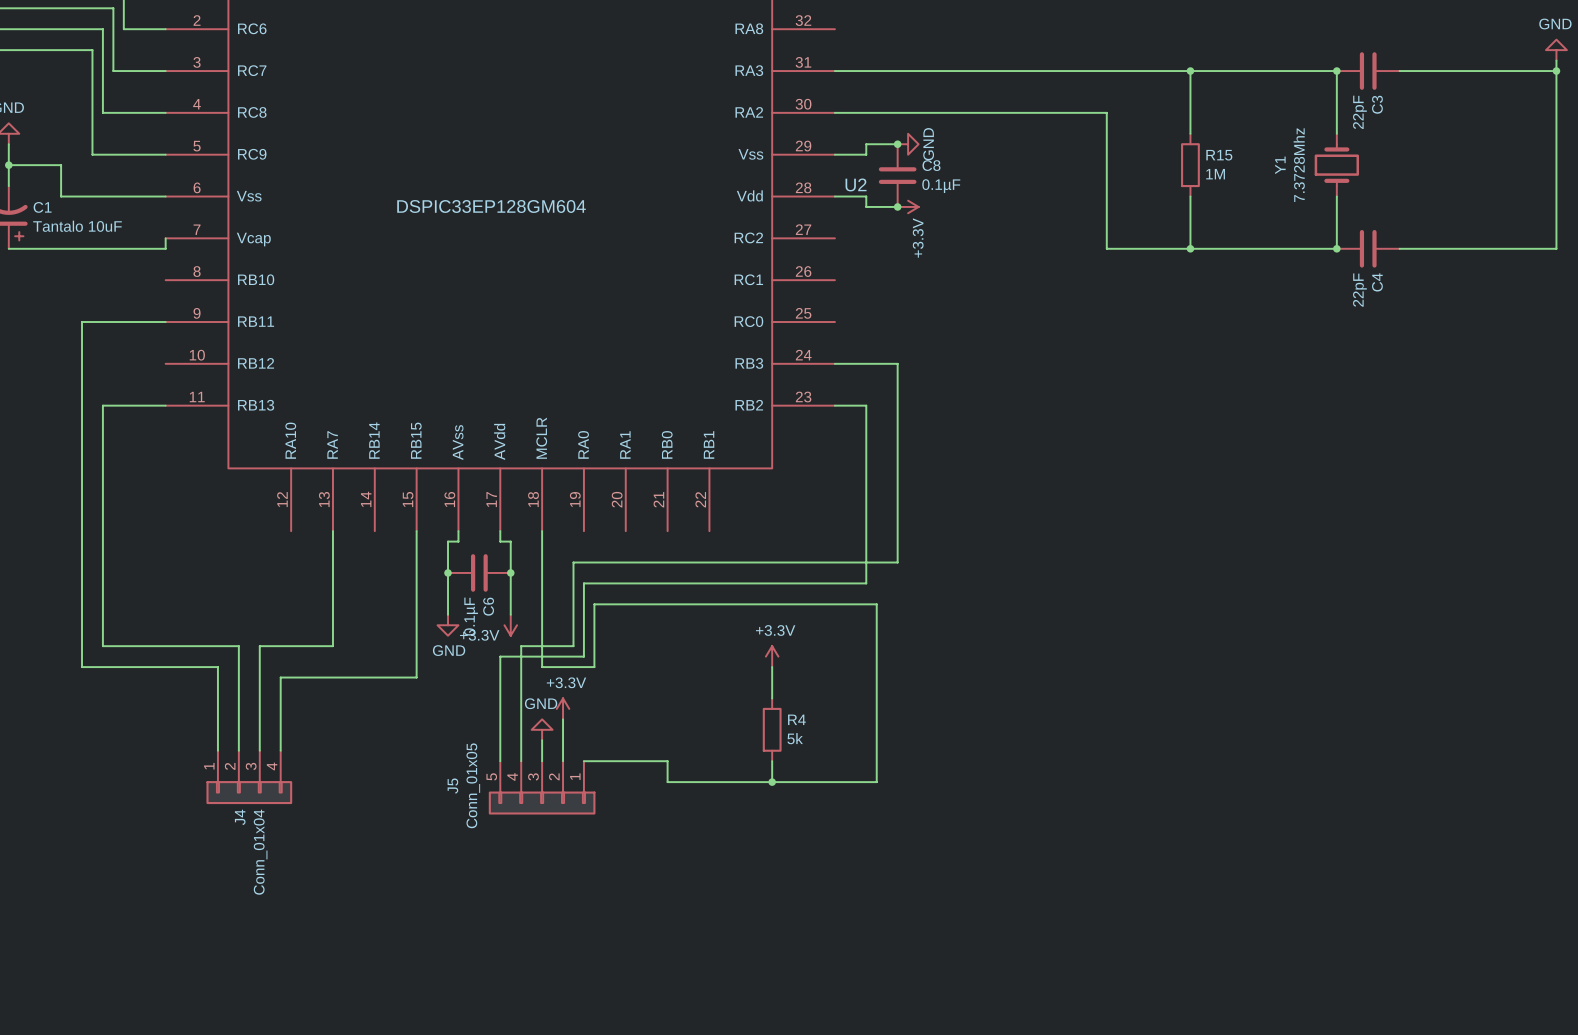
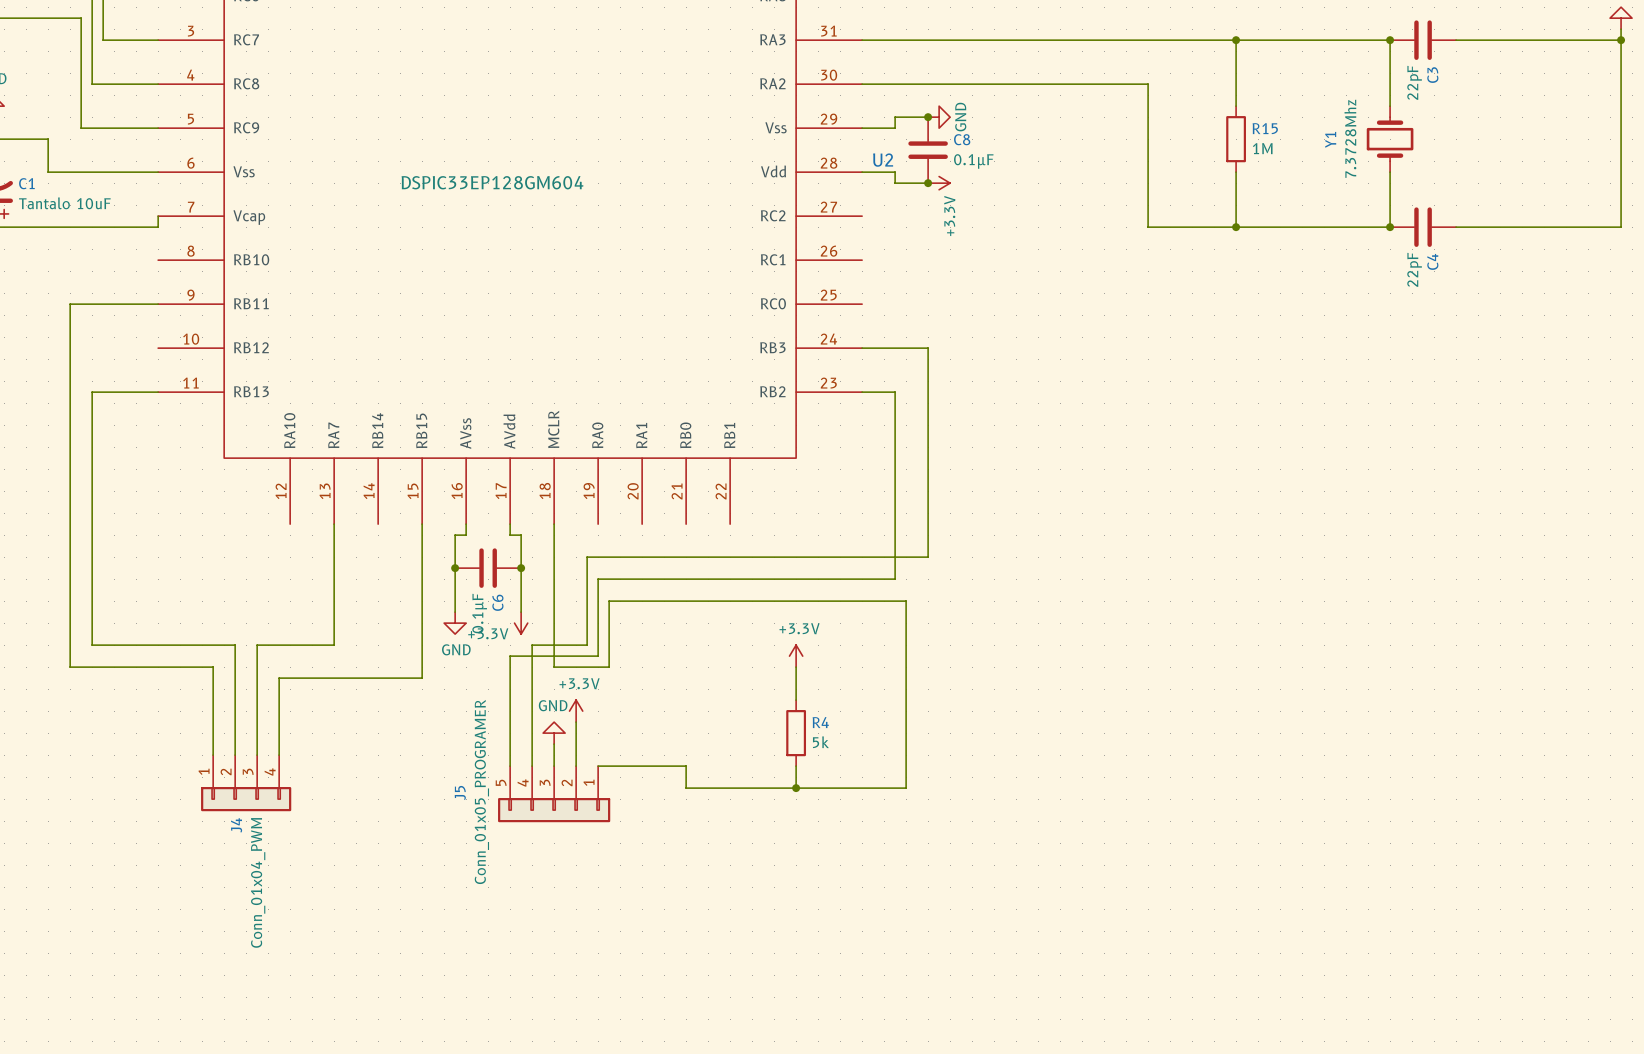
J5 value: Conn_01x05 (473, 785) -> Conn_01x05_PROGRAMER (481, 791)
J4 value: Conn_01x04 (260, 852) -> Conn_01x04_PWM (258, 882)

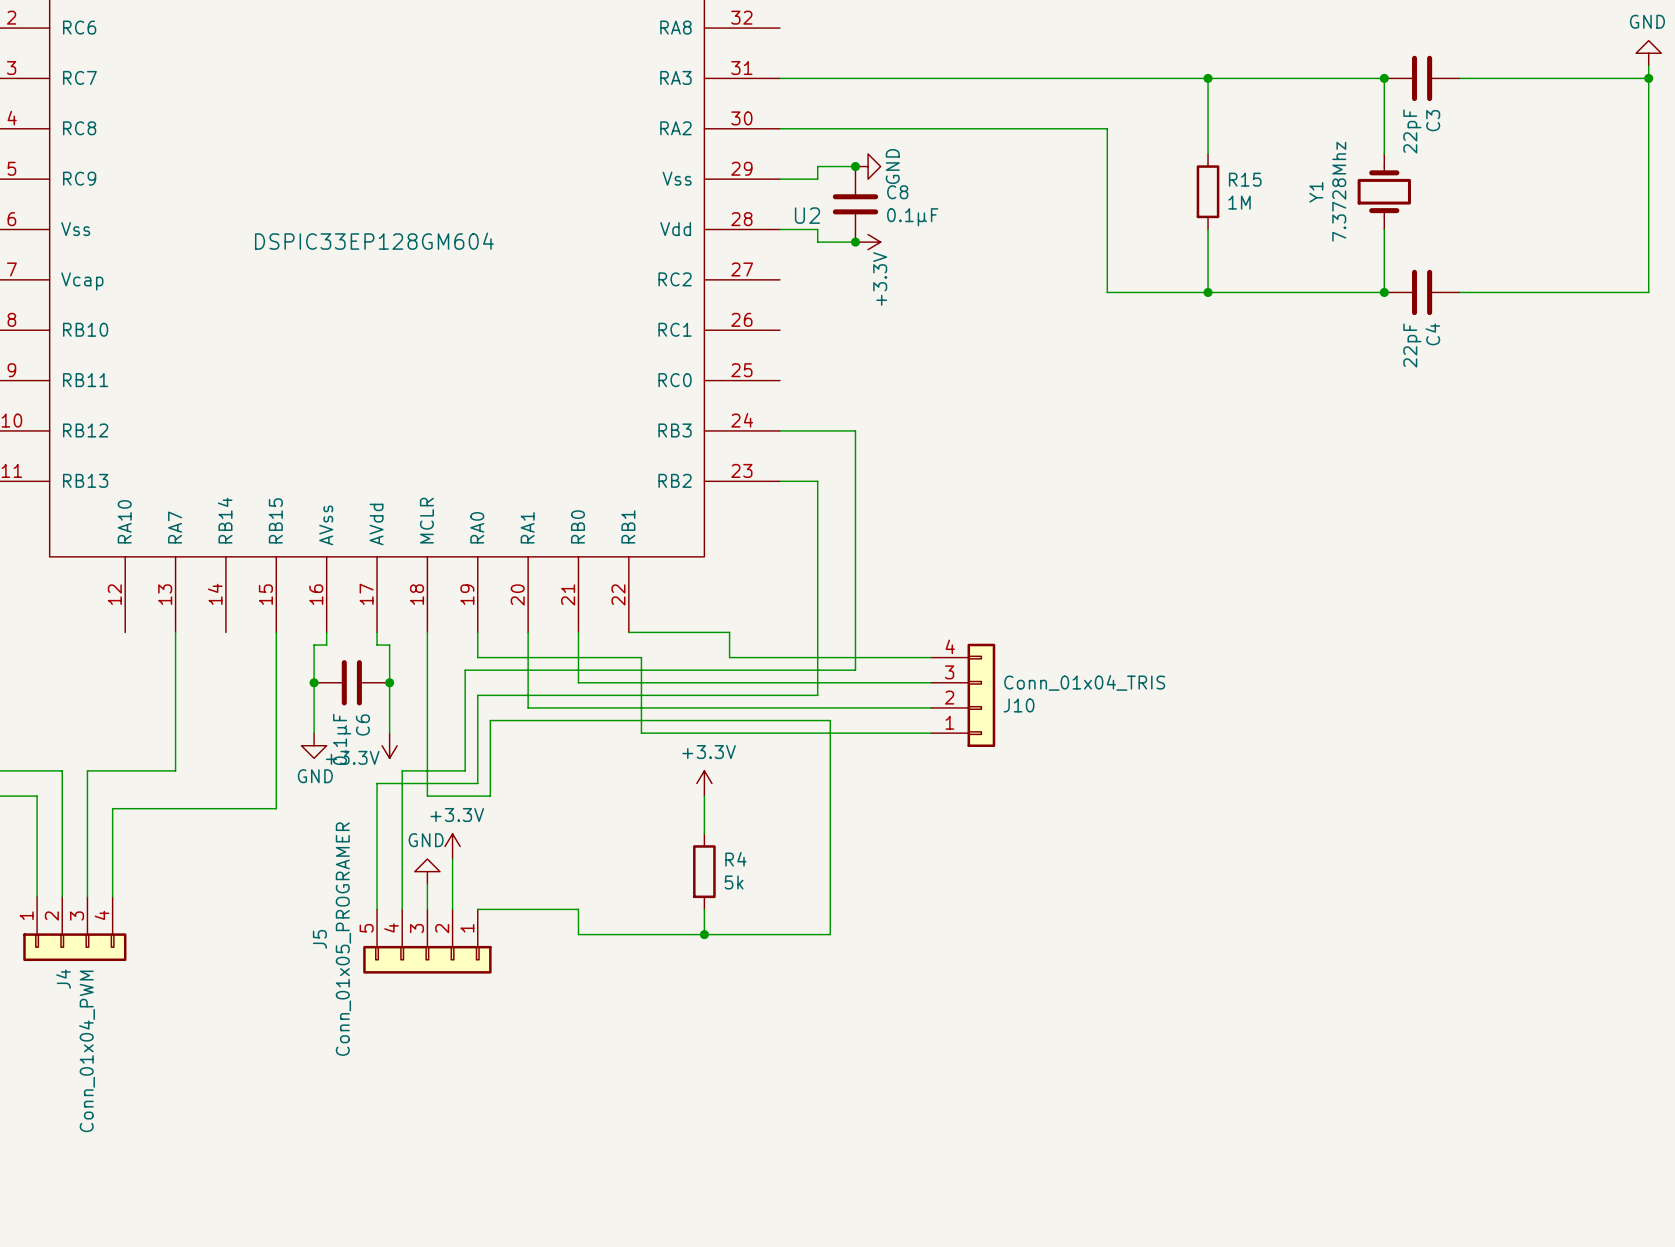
wire: none -> (477, 632) (477, 657) (641, 657) (641, 733) (931, 733)
wire: none -> (528, 632) (528, 707) (931, 707)
wire: none -> (578, 632) (578, 682) (931, 682)
wire: none -> (628, 632) (729, 632) (729, 657) (931, 657)
J10: none -> Conn_01x04_TRIS (963, 695)

